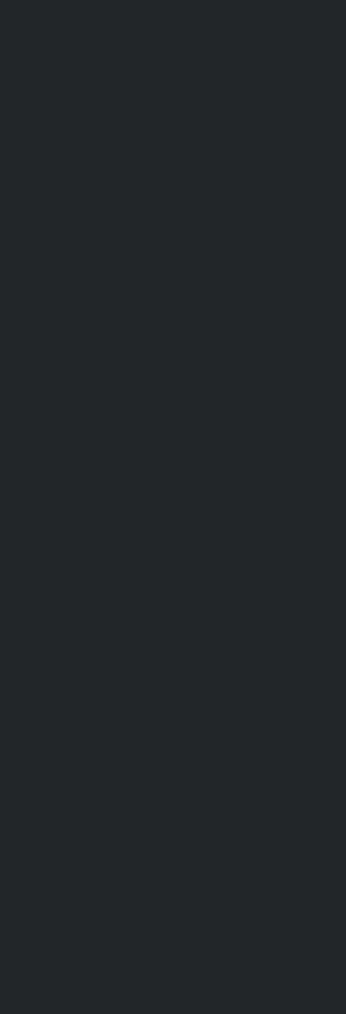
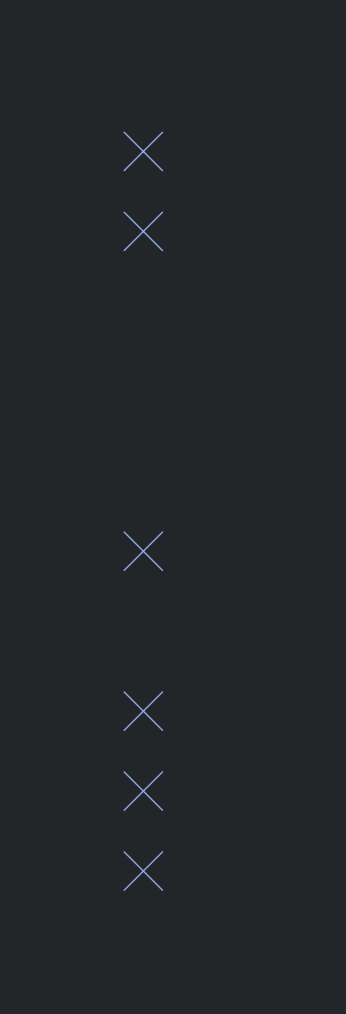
no-connect mark: none -> (143, 151)
no-connect mark: none -> (143, 231)
no-connect mark: none -> (143, 551)
no-connect mark: none -> (143, 711)
no-connect mark: none -> (143, 791)
no-connect mark: none -> (143, 871)

